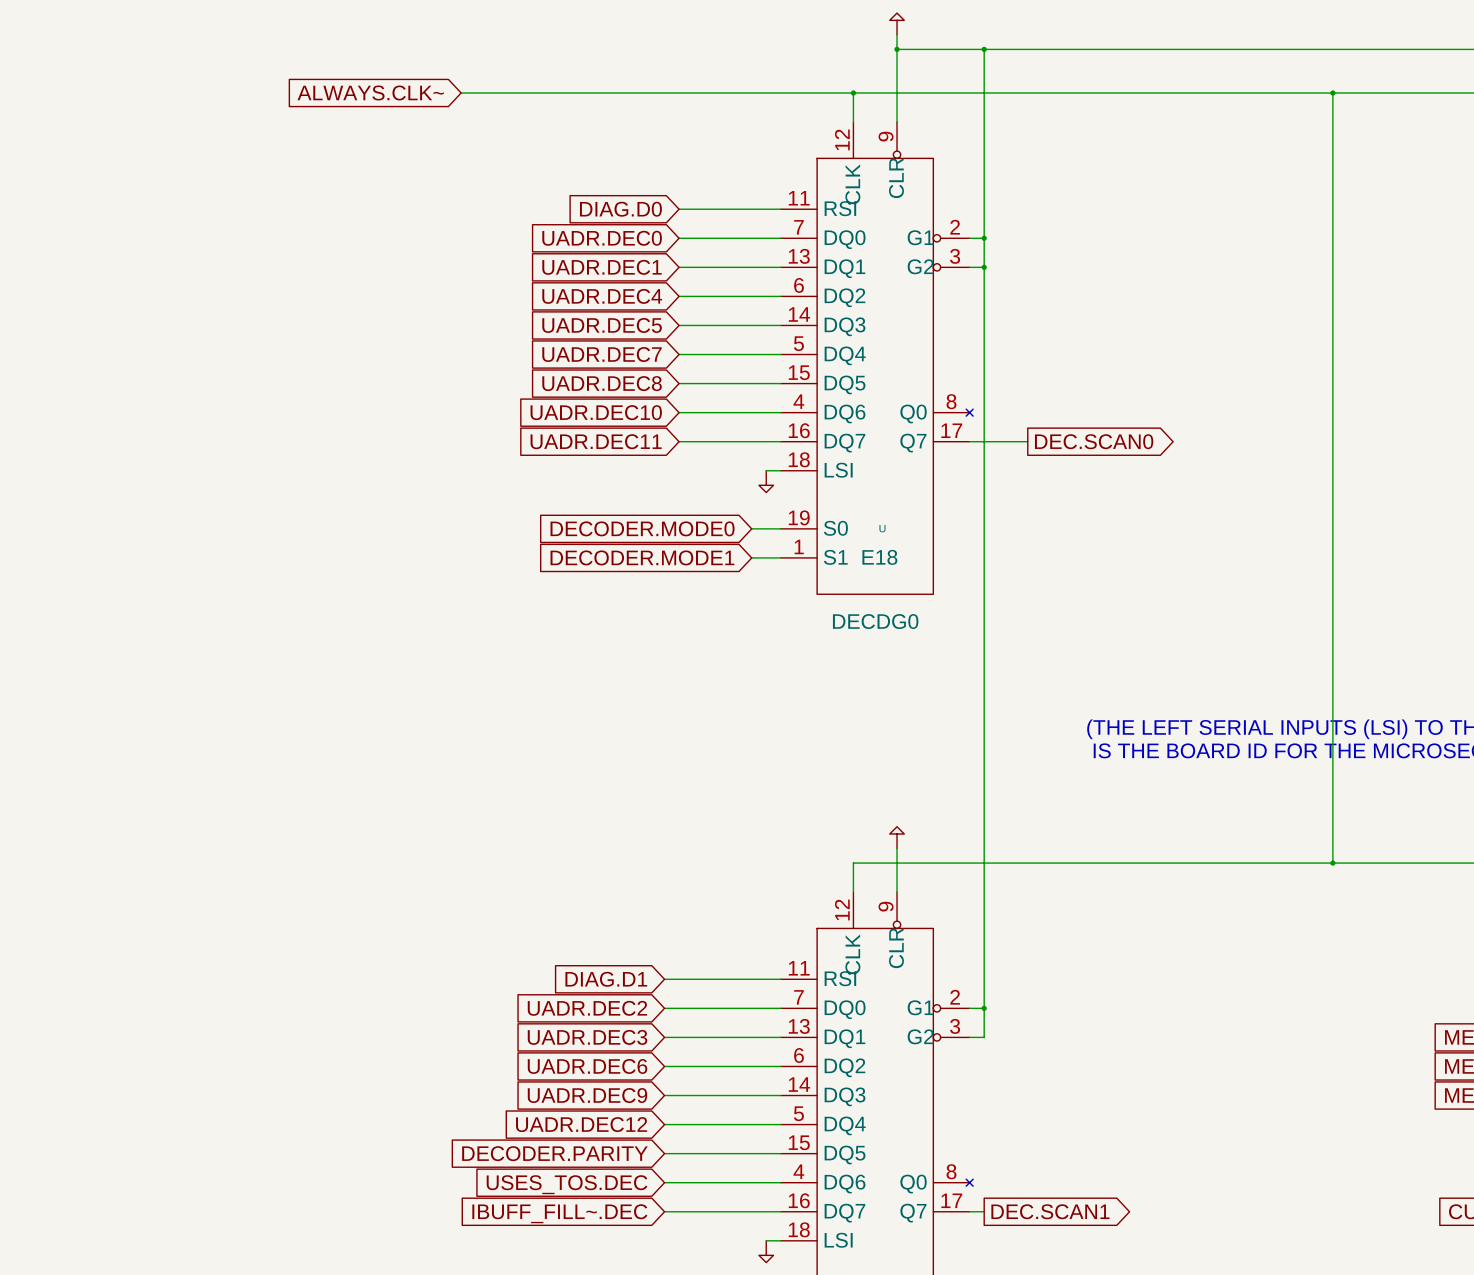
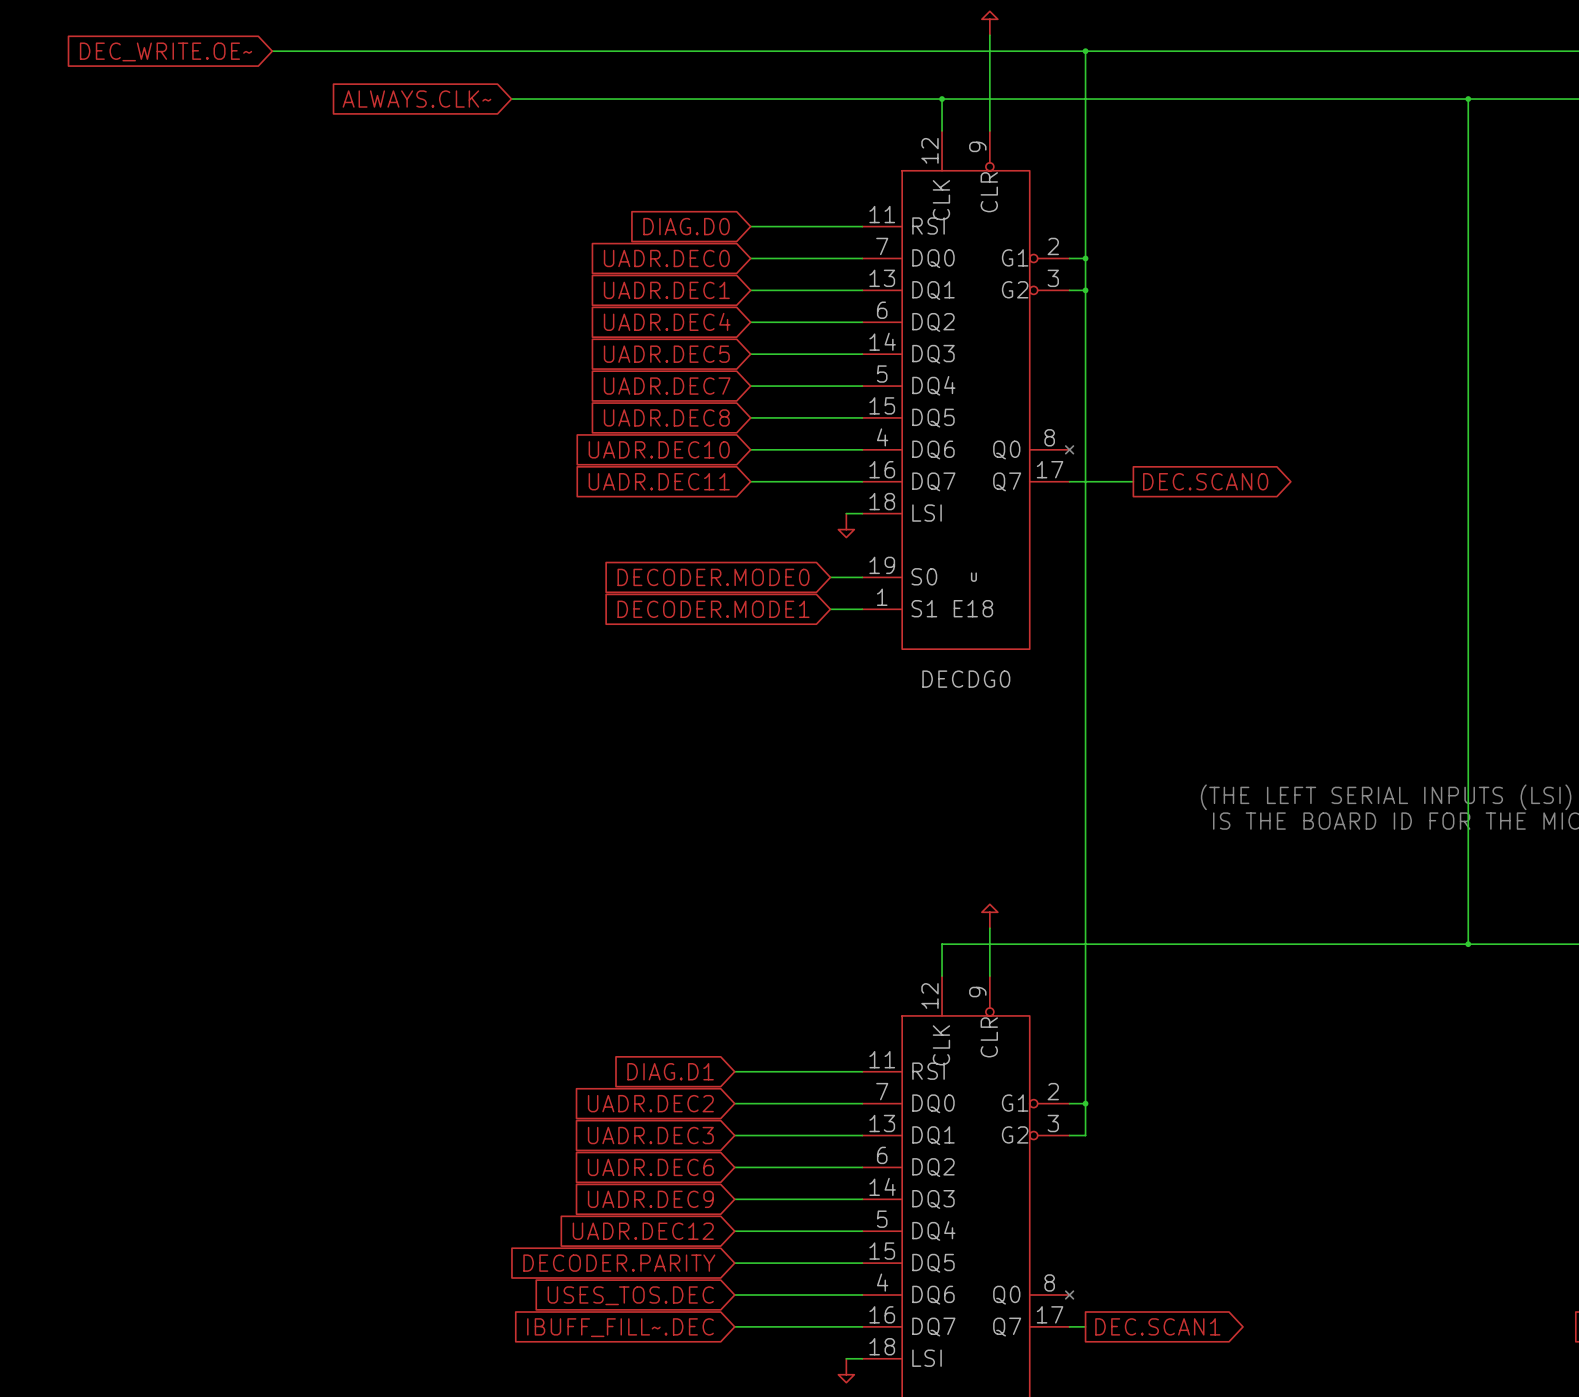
wire: none -> (272, 51) (989, 51)
junction: (897, 49) -> none
global label: none -> DEC_WRITE.OE~ (166, 51)

